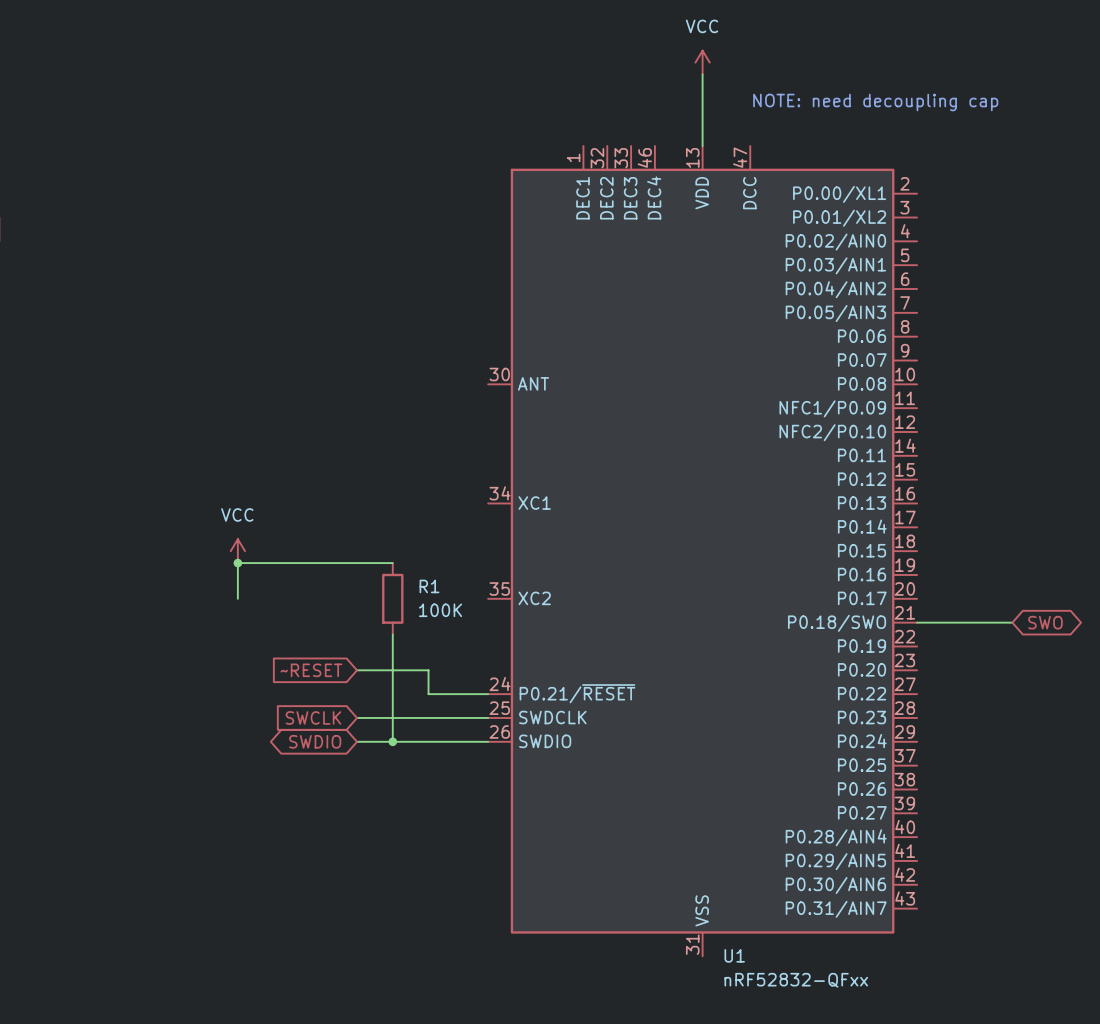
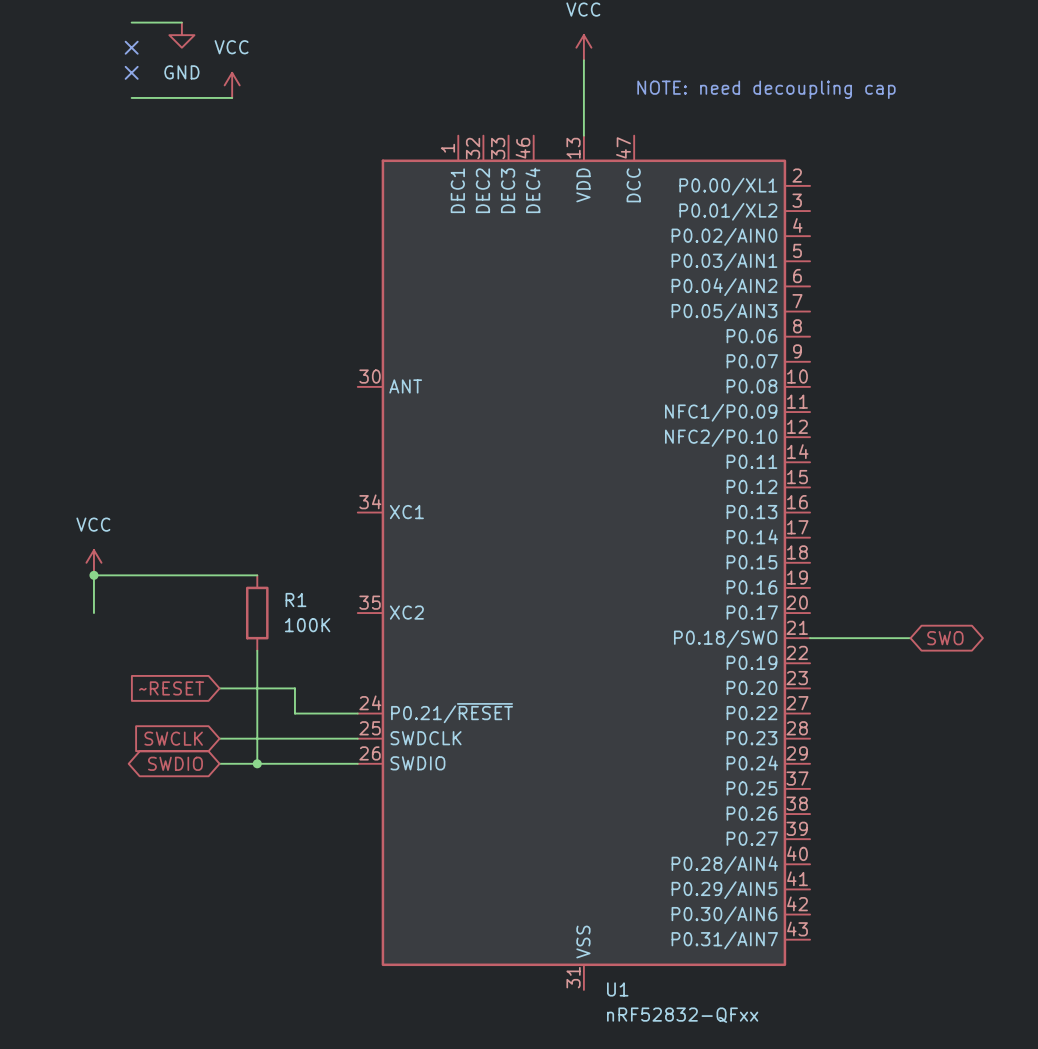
wire: none -> (131, 22) (181, 22)
power symbol: none -> GND (181, 35)
no-connect mark: none -> (131, 47)
no-connect mark: none -> (131, 72)
power symbol: none -> VCC (232, 85)
wire: none -> (131, 97) (232, 97)

